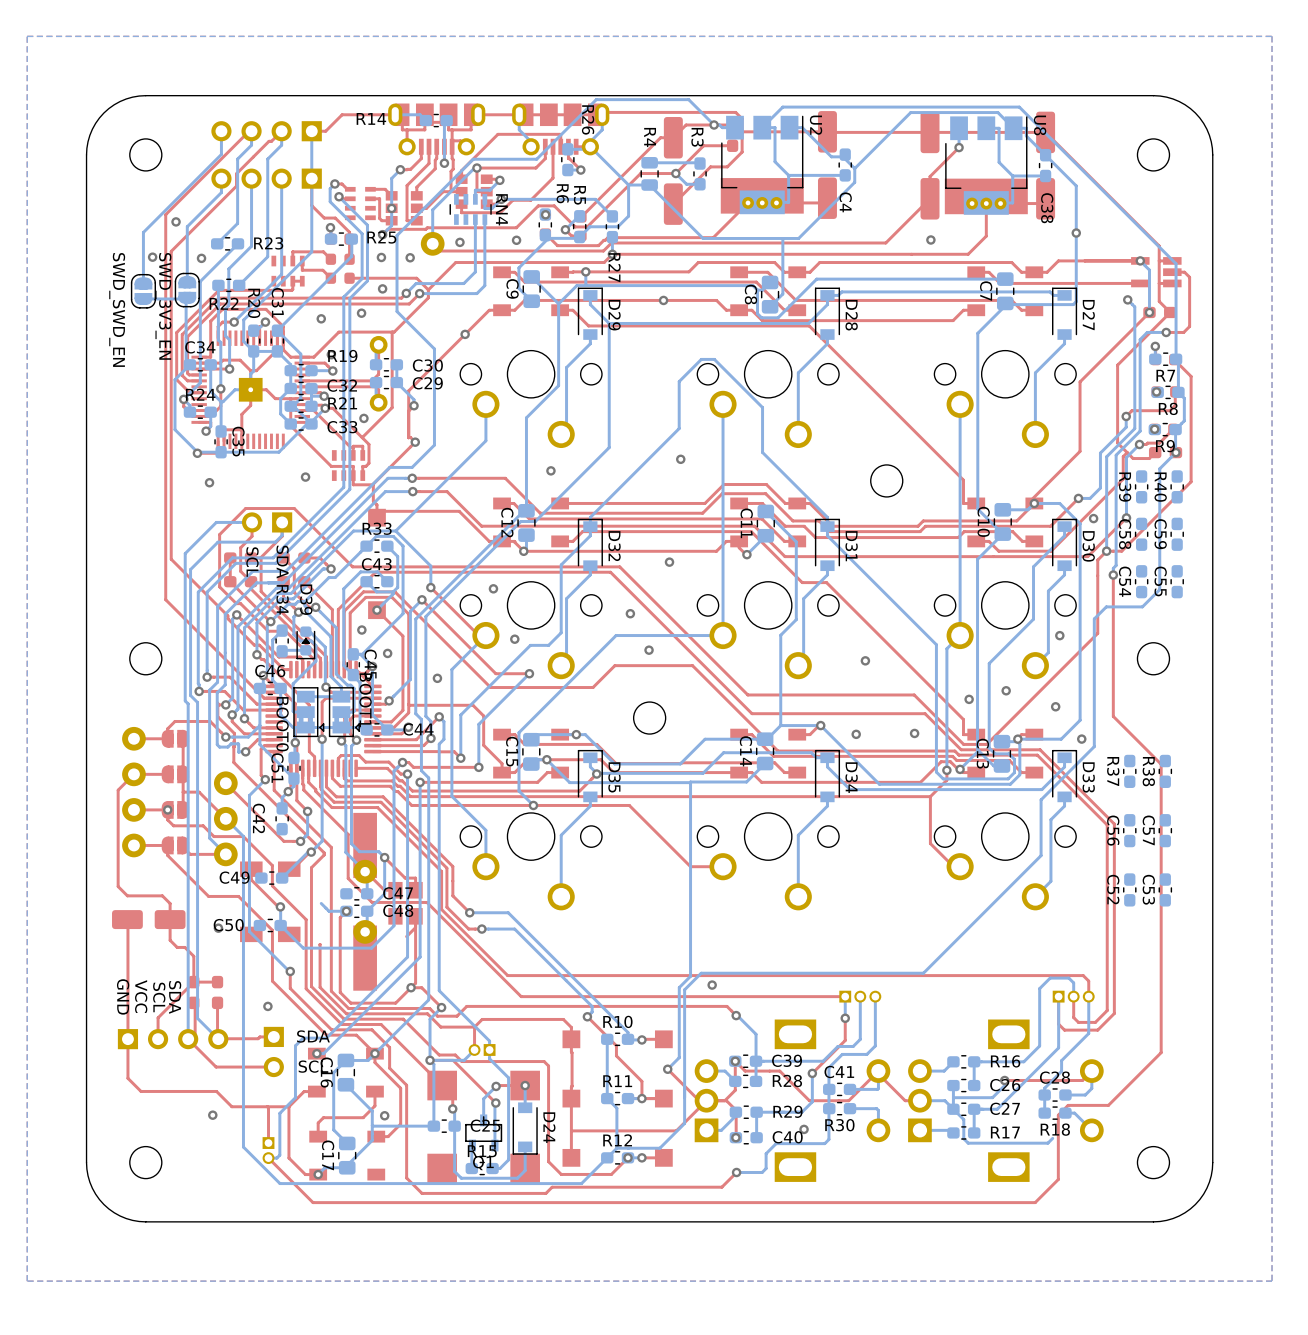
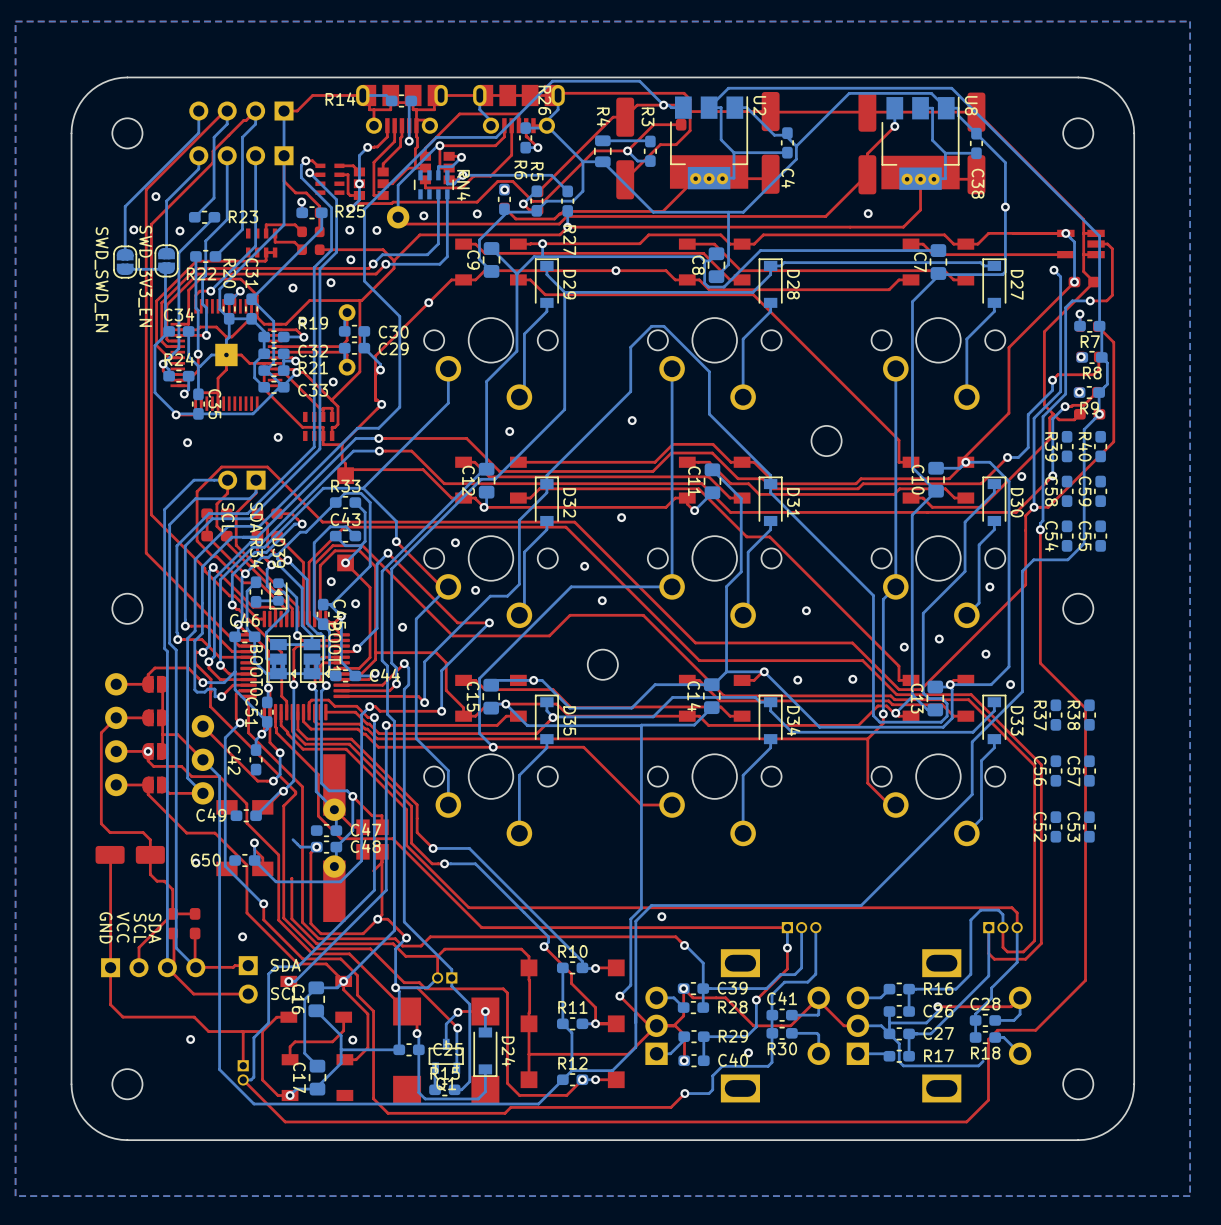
top track: (251, 869) (251, 879) (280, 906) -> (262, 868) (262, 857) (254, 849) (254, 842)

